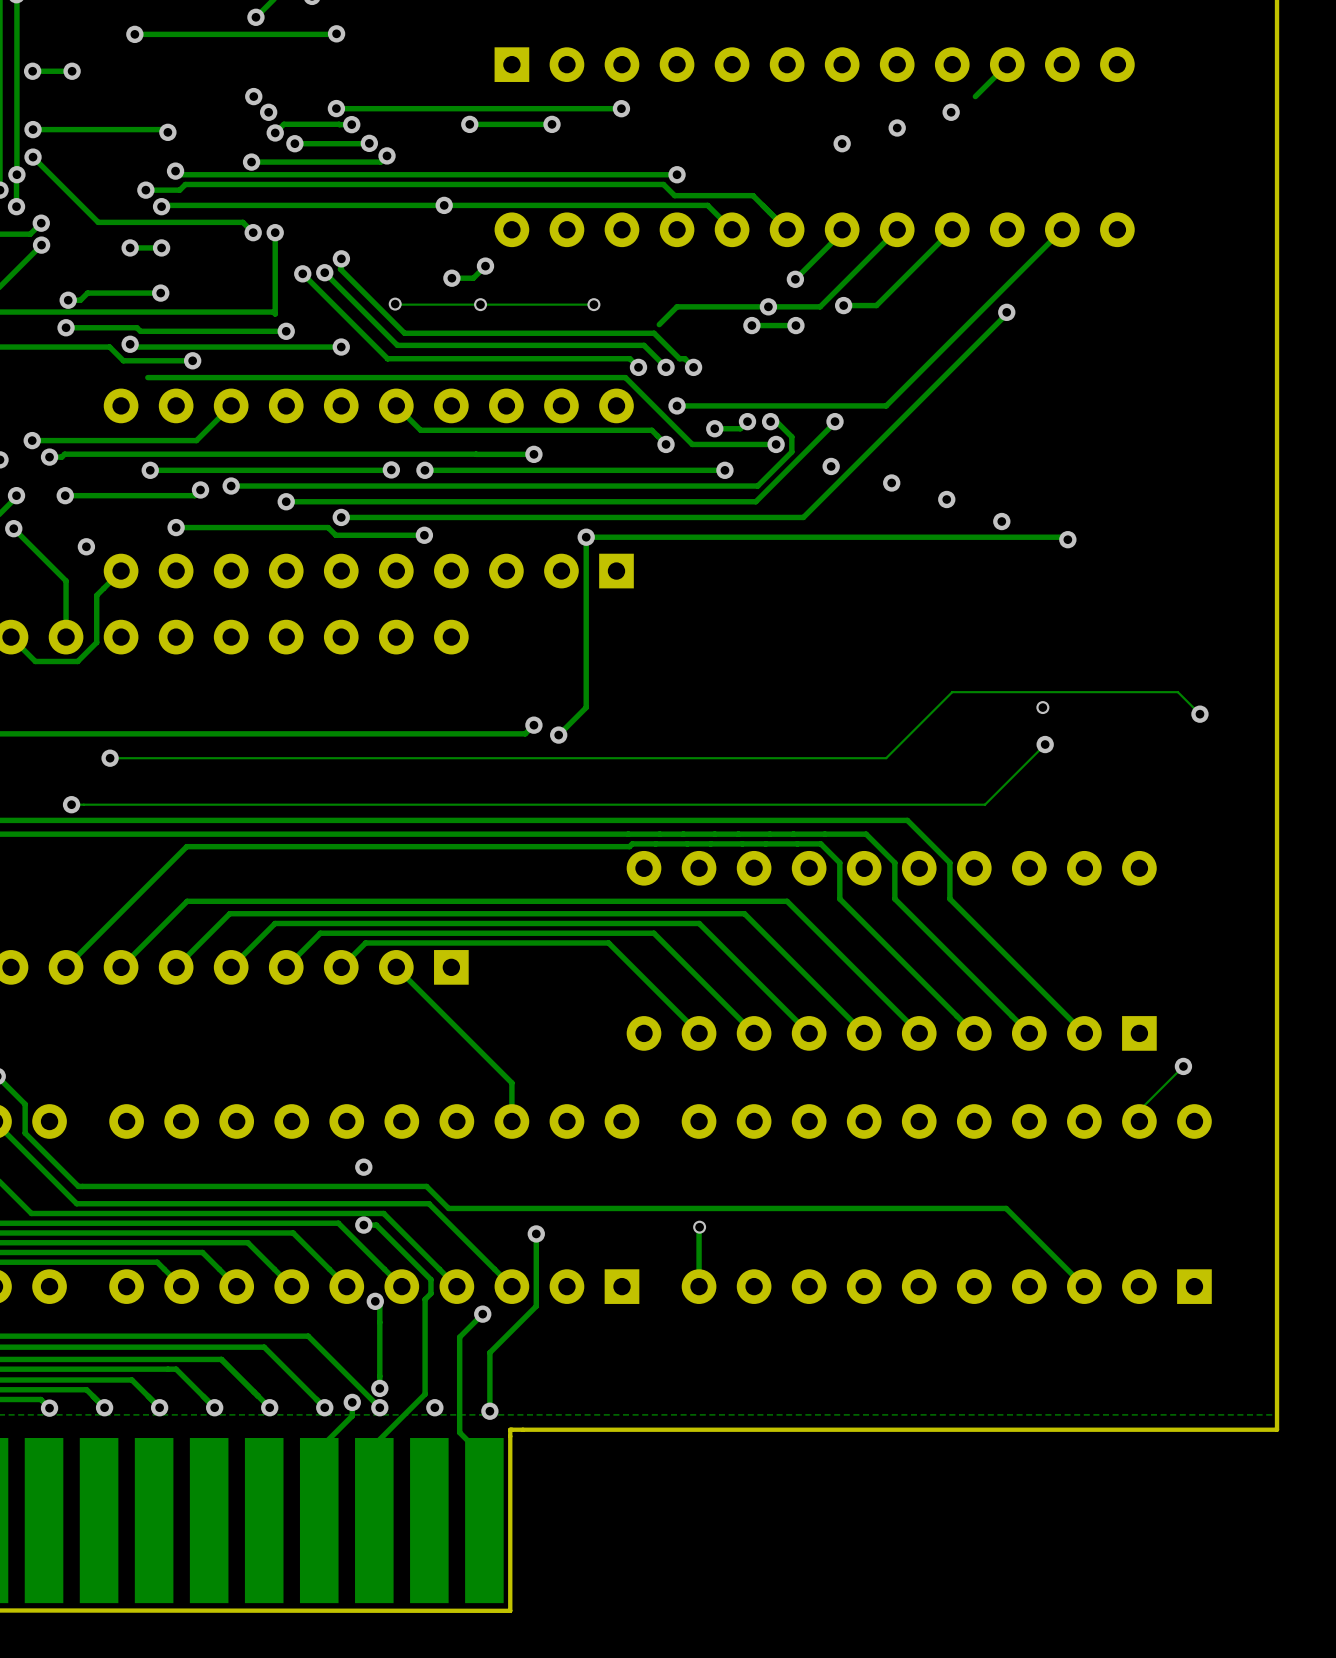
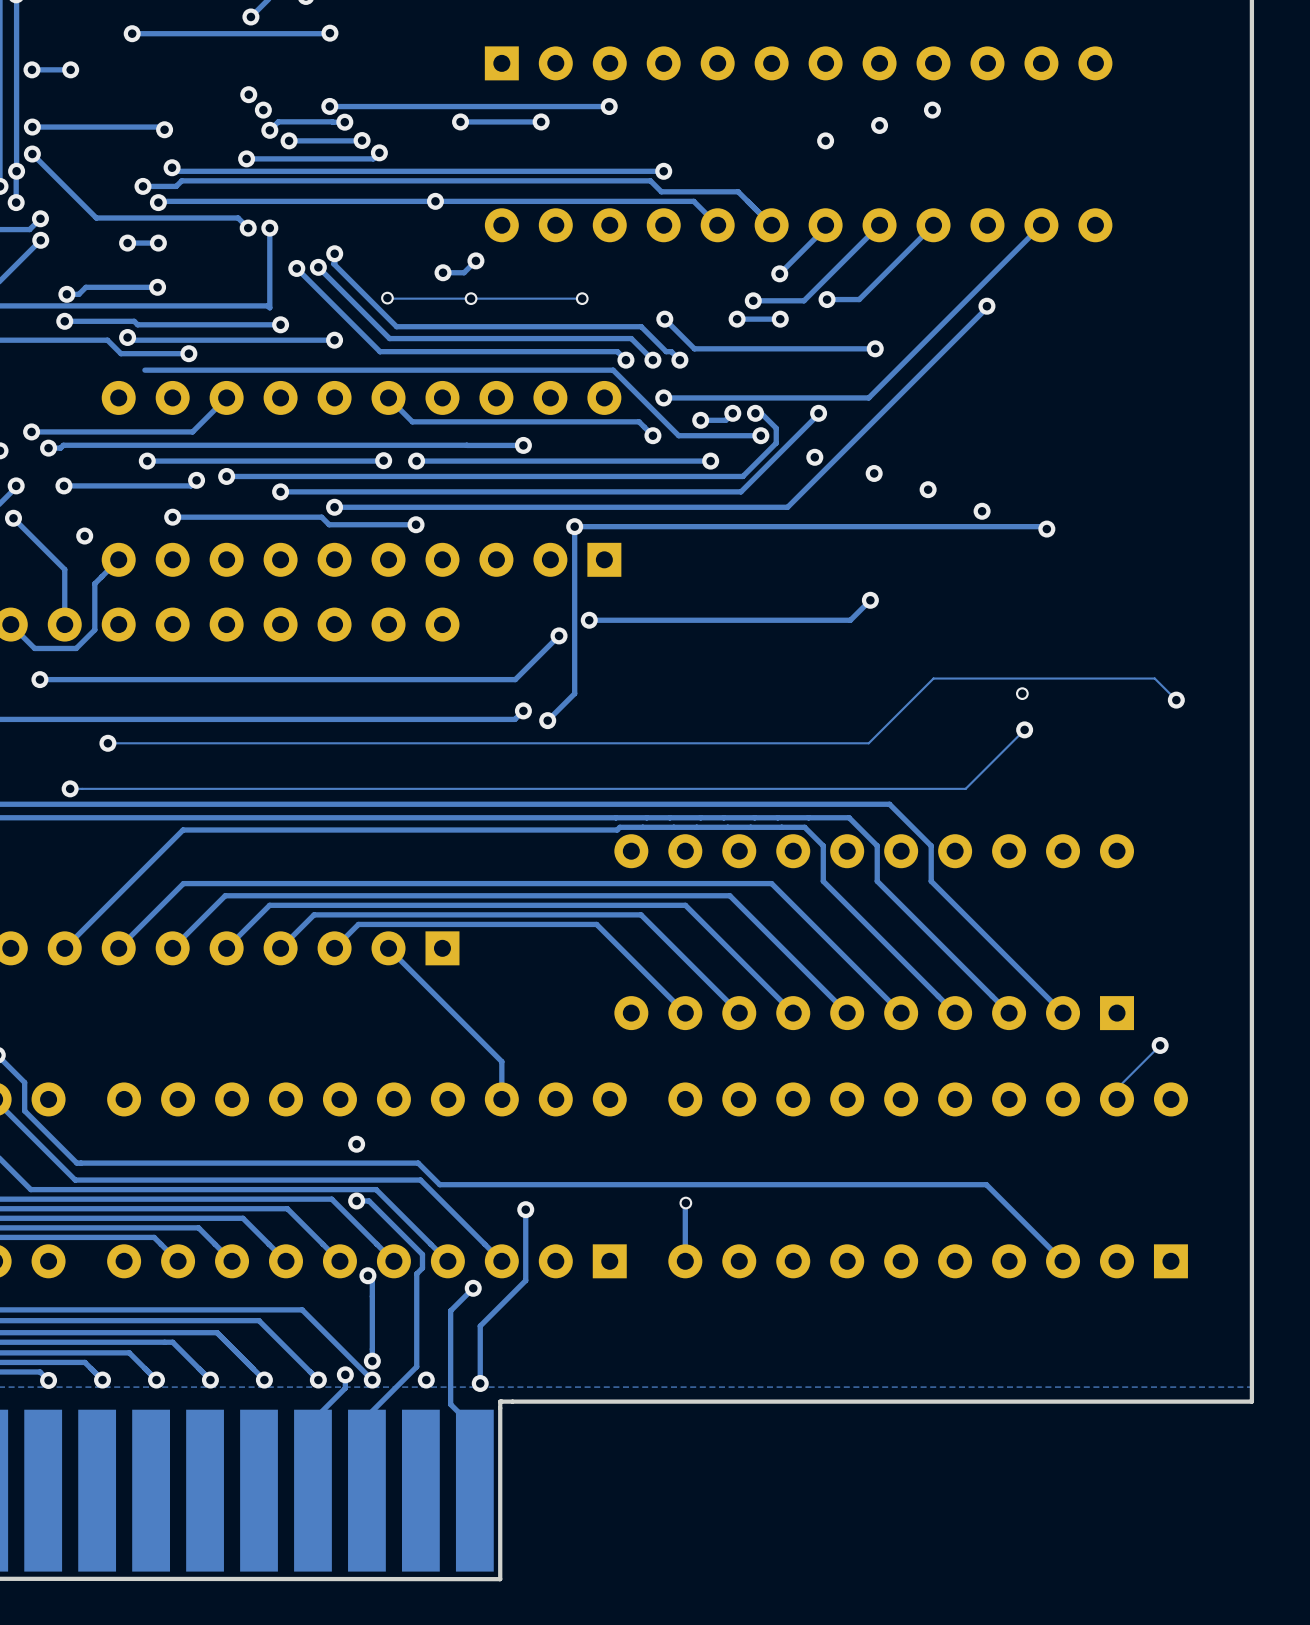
track: (1007, 64) (975, 96) -> none
track: (768, 306) (677, 306) (659, 324) -> none
track: none -> (664, 319) (694, 348) (875, 348)
via: none -> (664, 319)
via: none -> (875, 348)
track: none -> (870, 600) (850, 620) (589, 620)
via: none -> (870, 600)
via: none -> (589, 620)
track: none -> (559, 635) (515, 679) (39, 679)
via: none -> (559, 635)
via: none -> (39, 679)

